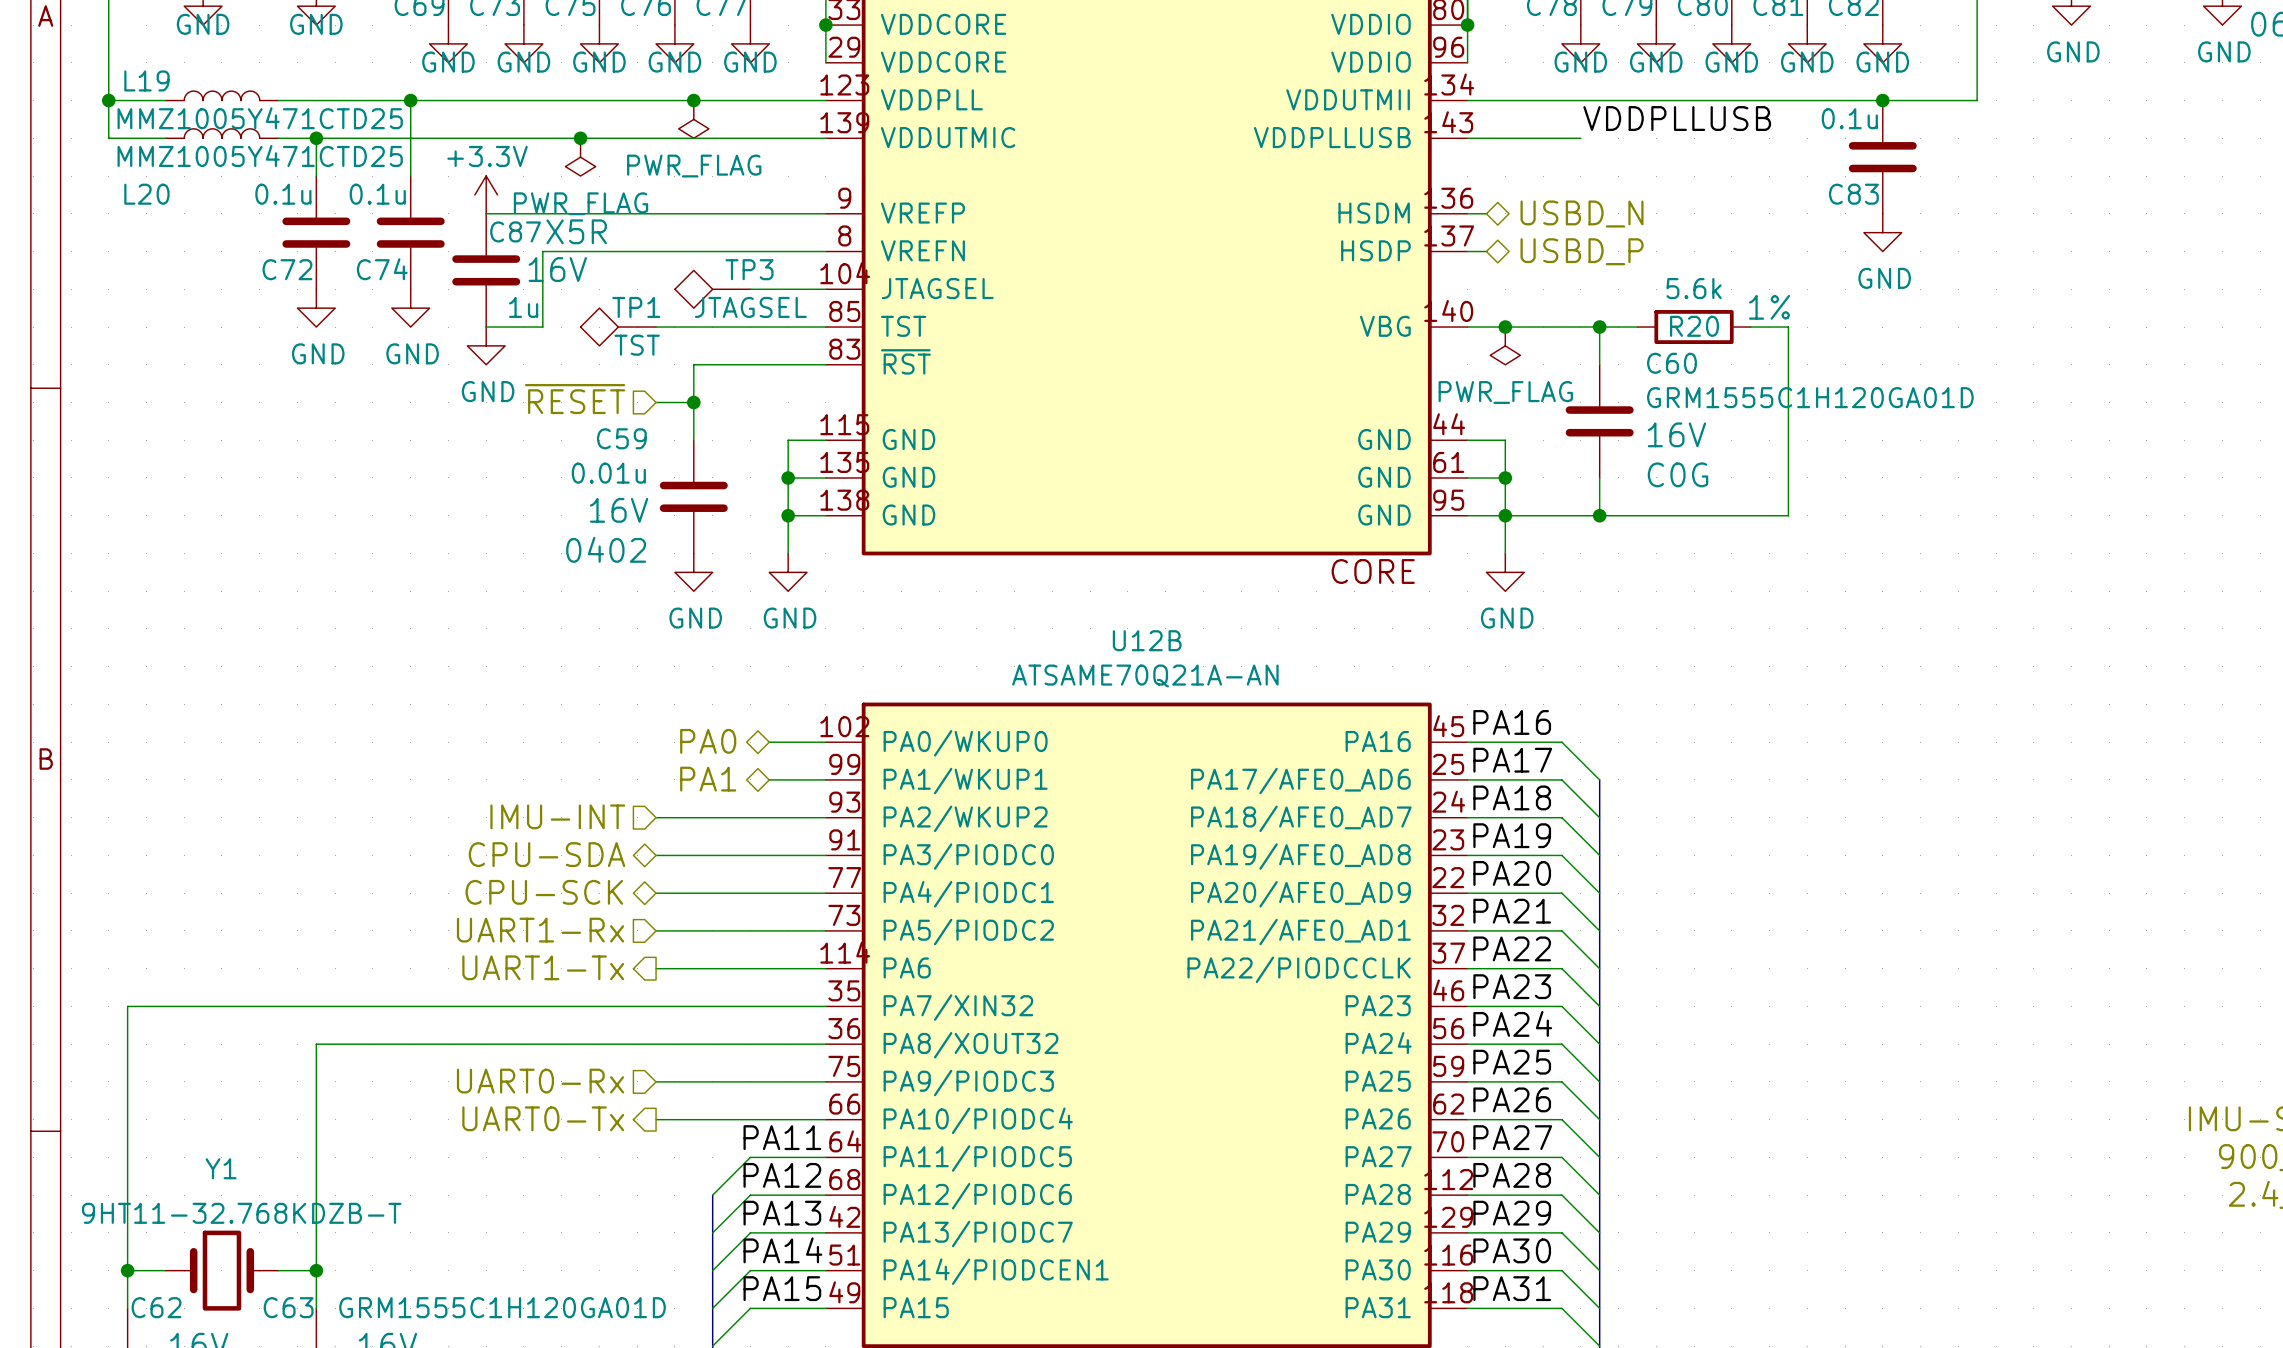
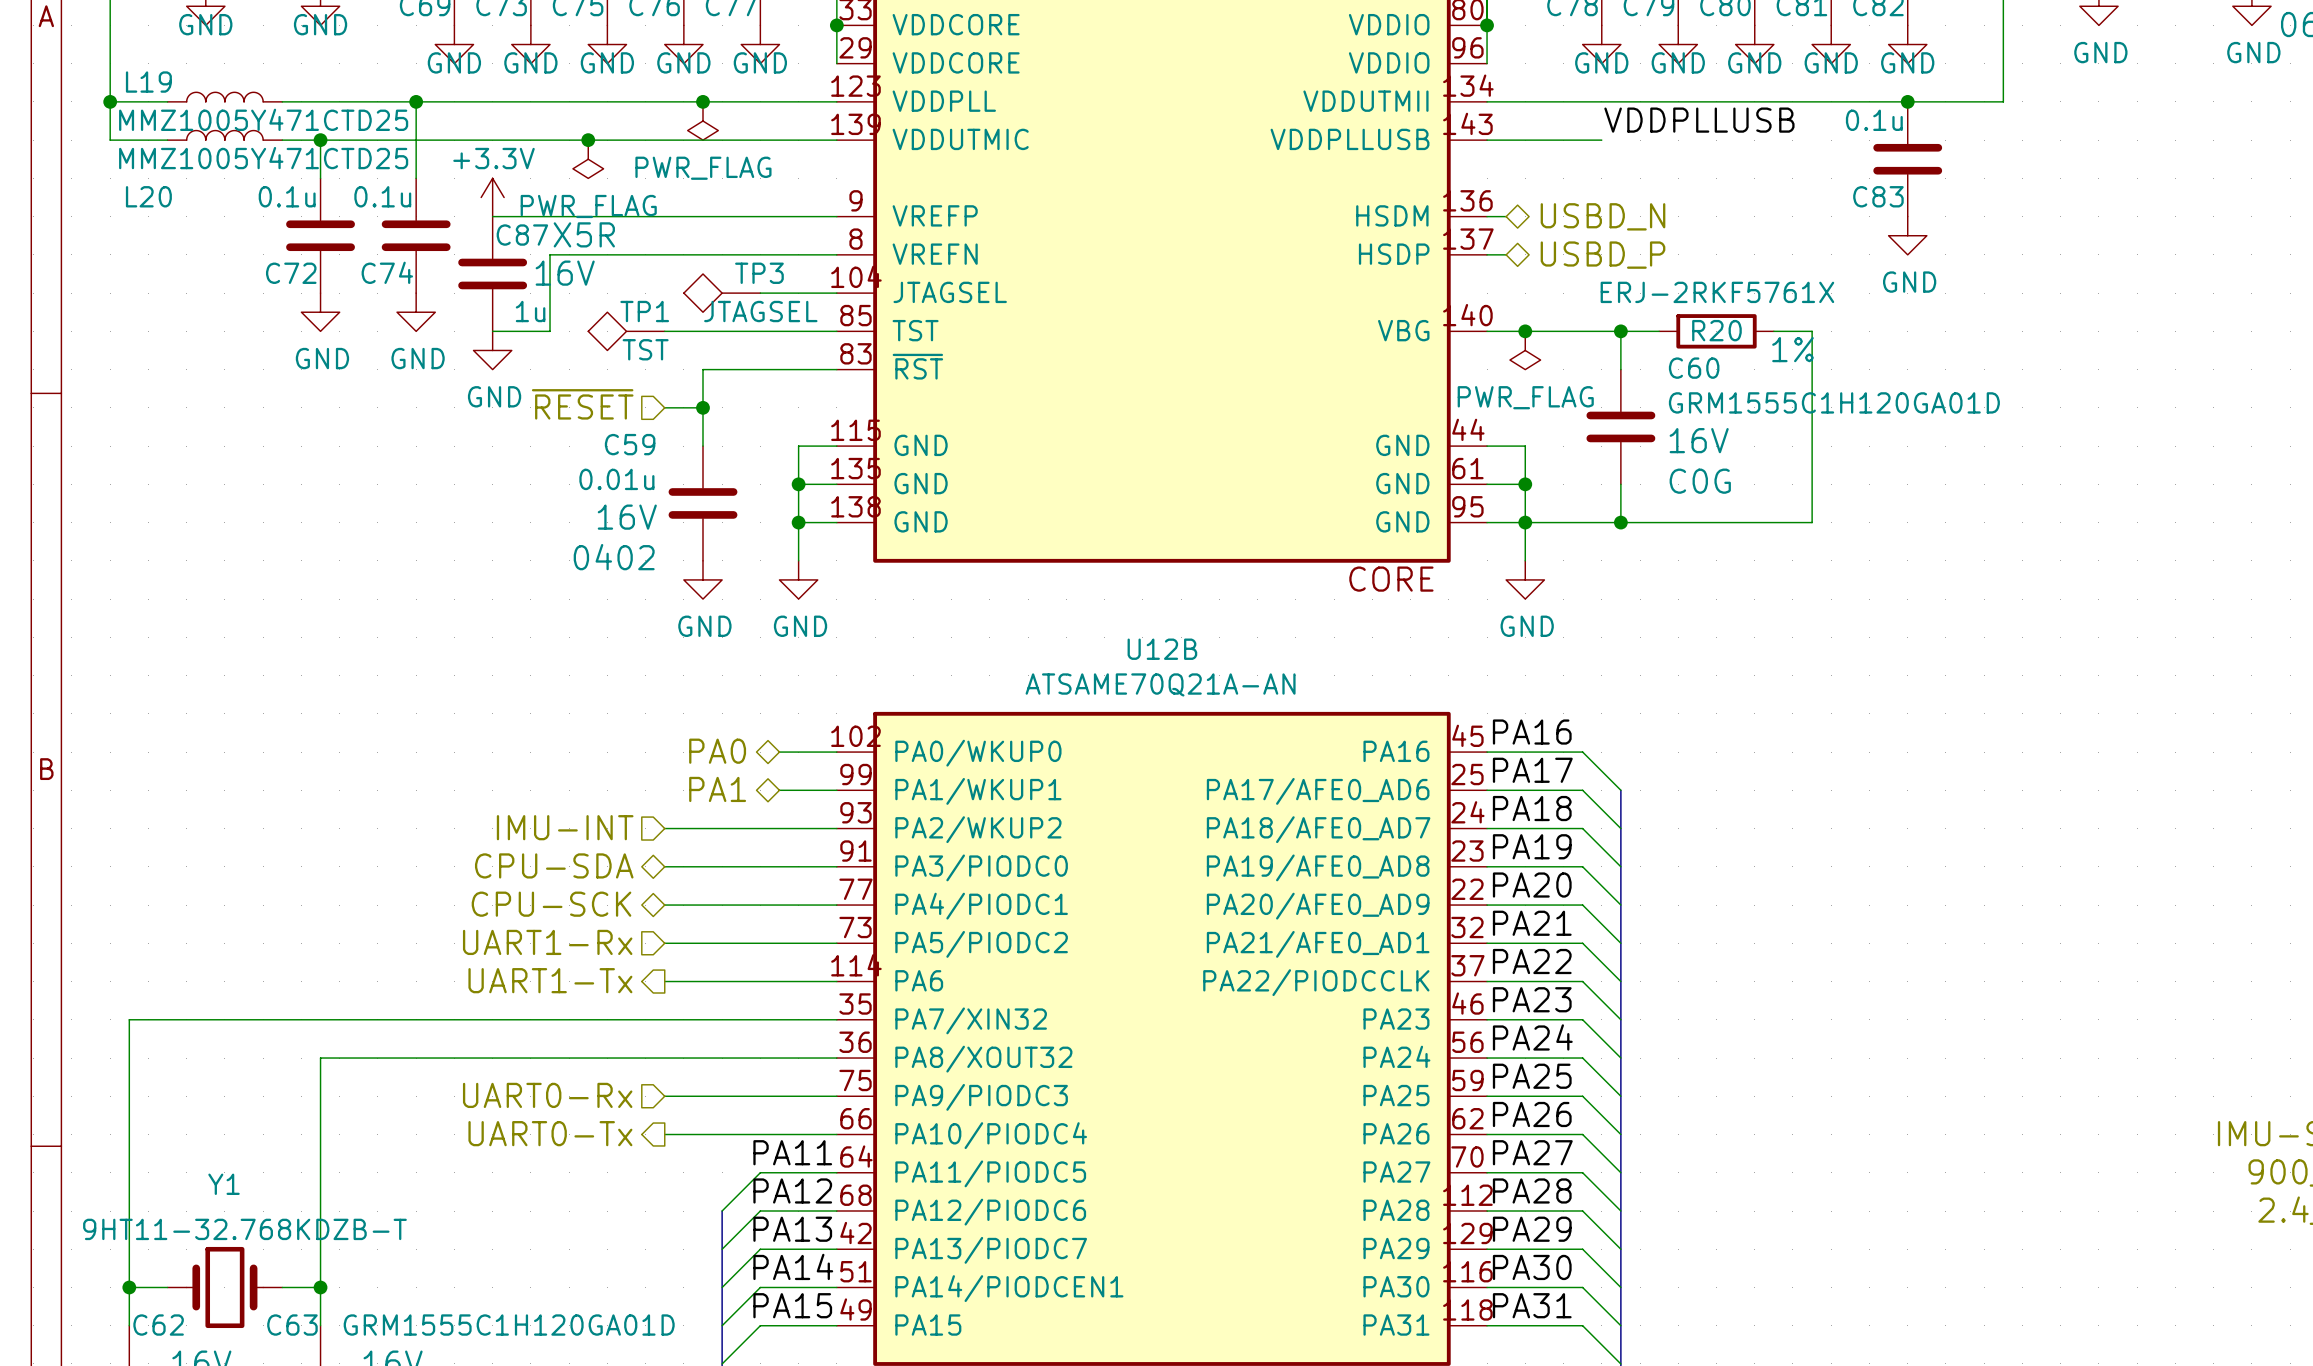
R20 value: 5.6k (1694, 288) -> ERJ-2RKF5761X (1717, 292)
R20 text position: 1% (1769, 307) -> 1% (1792, 349)

